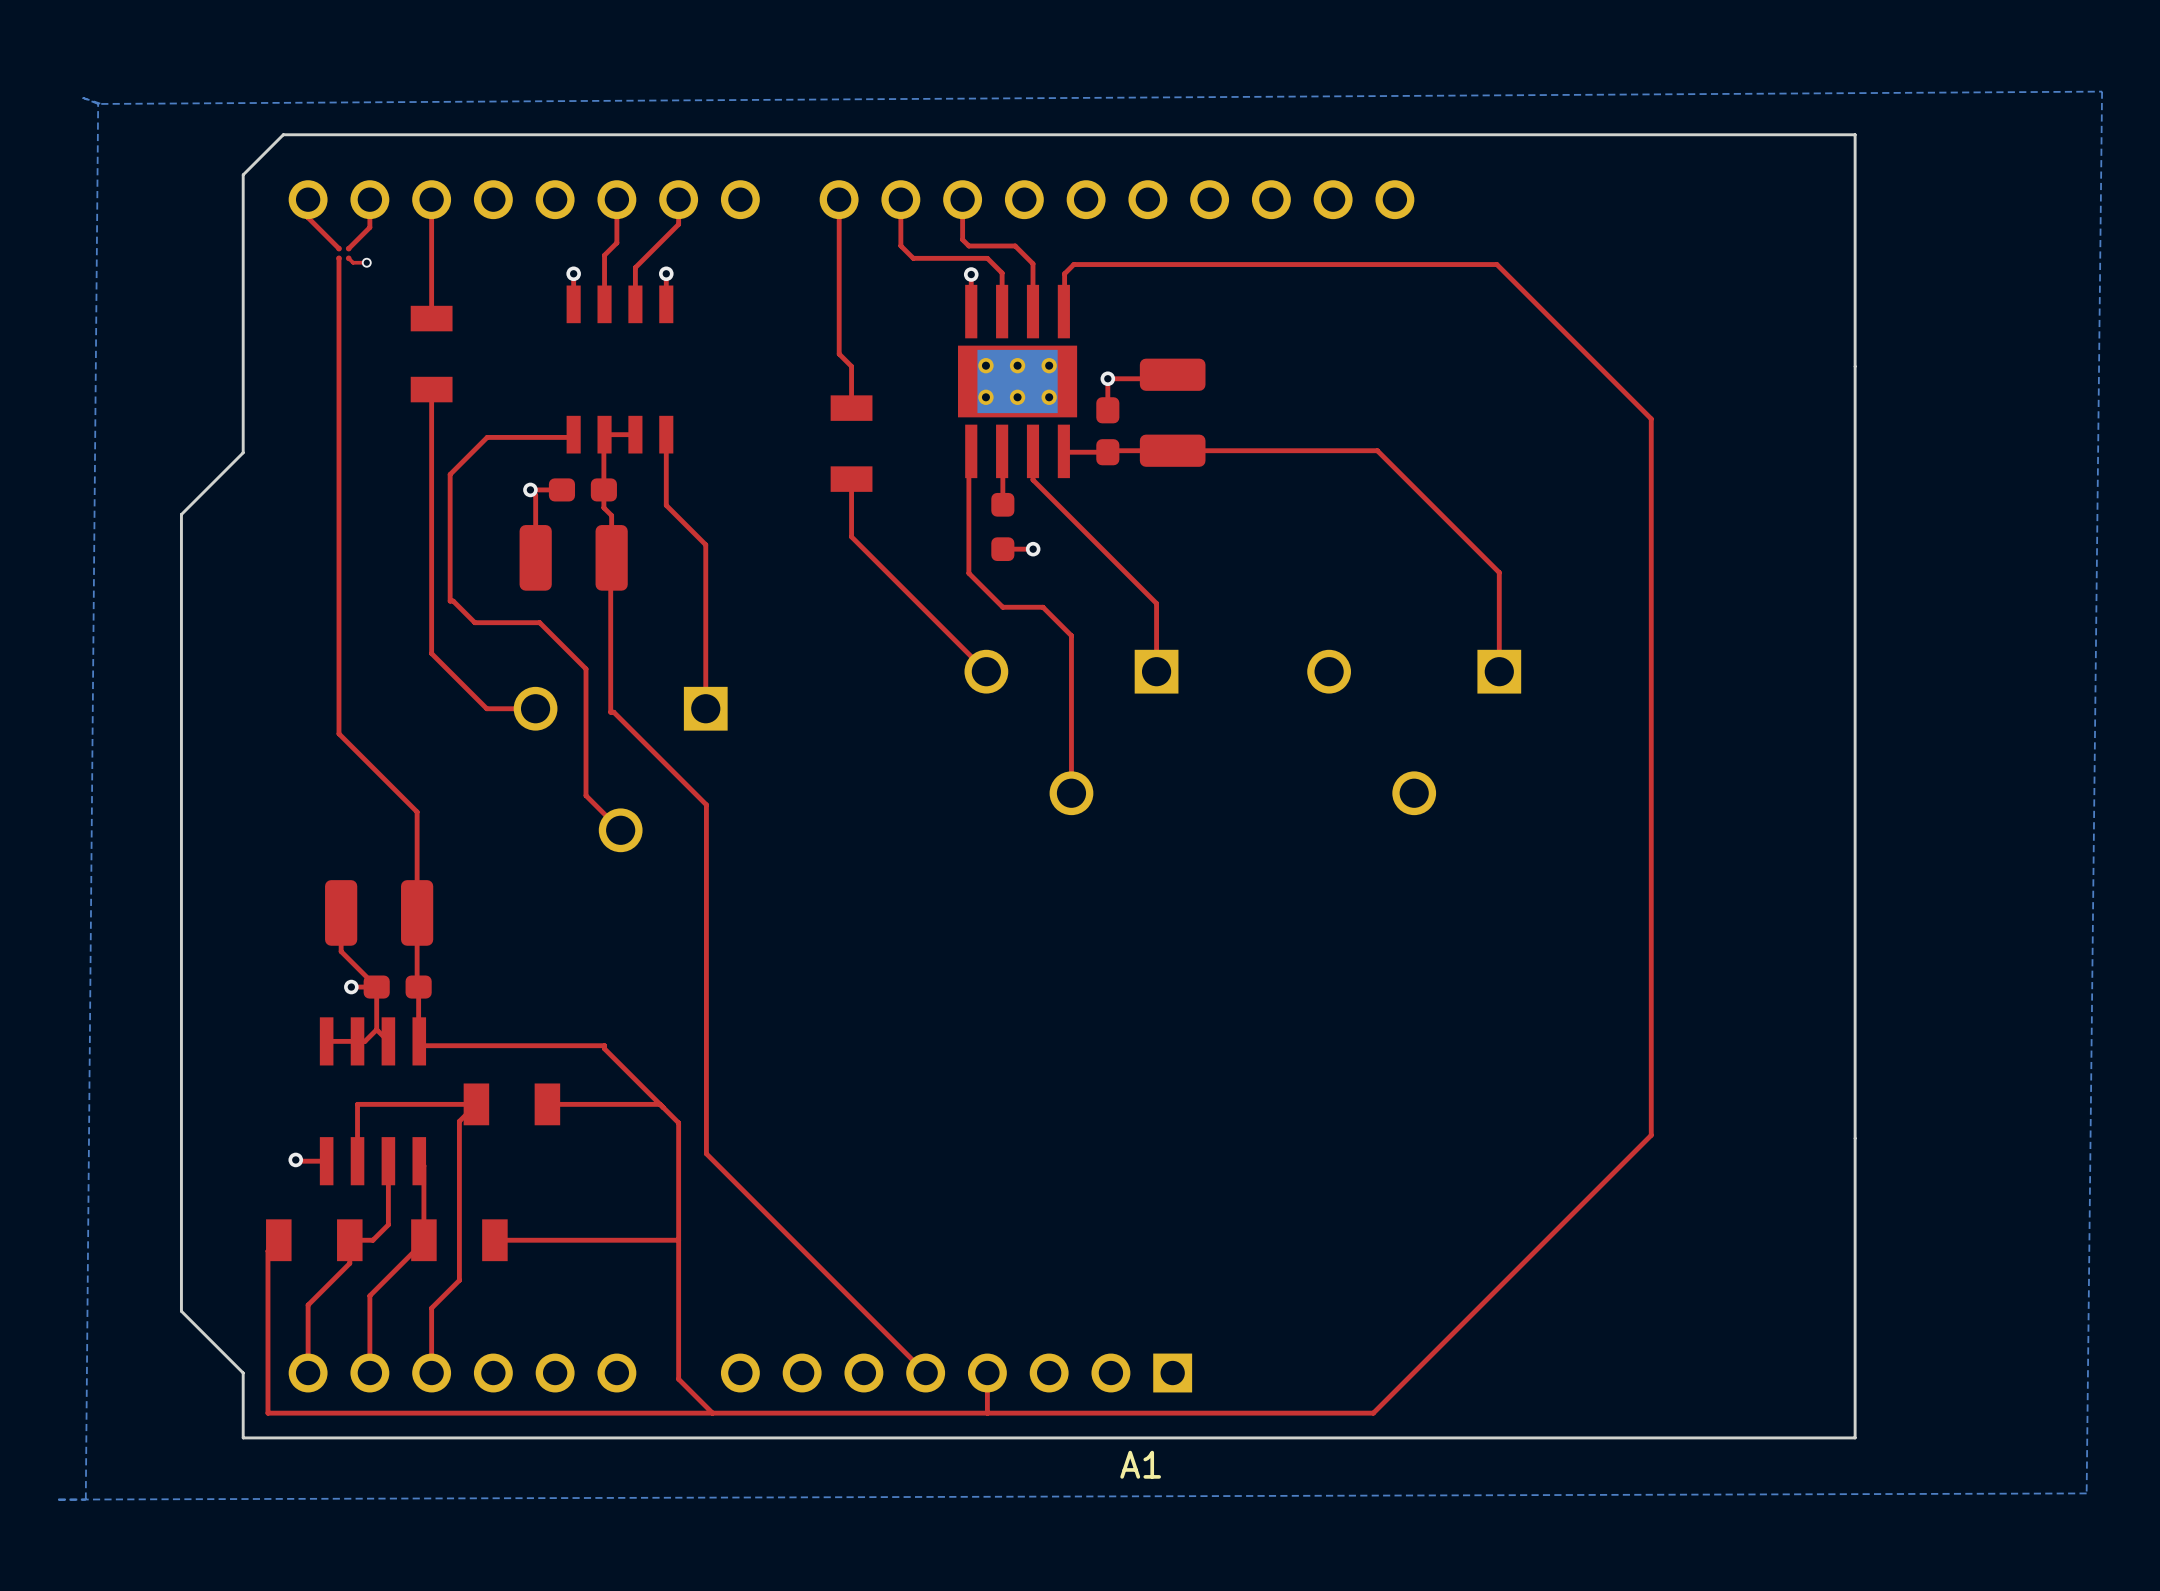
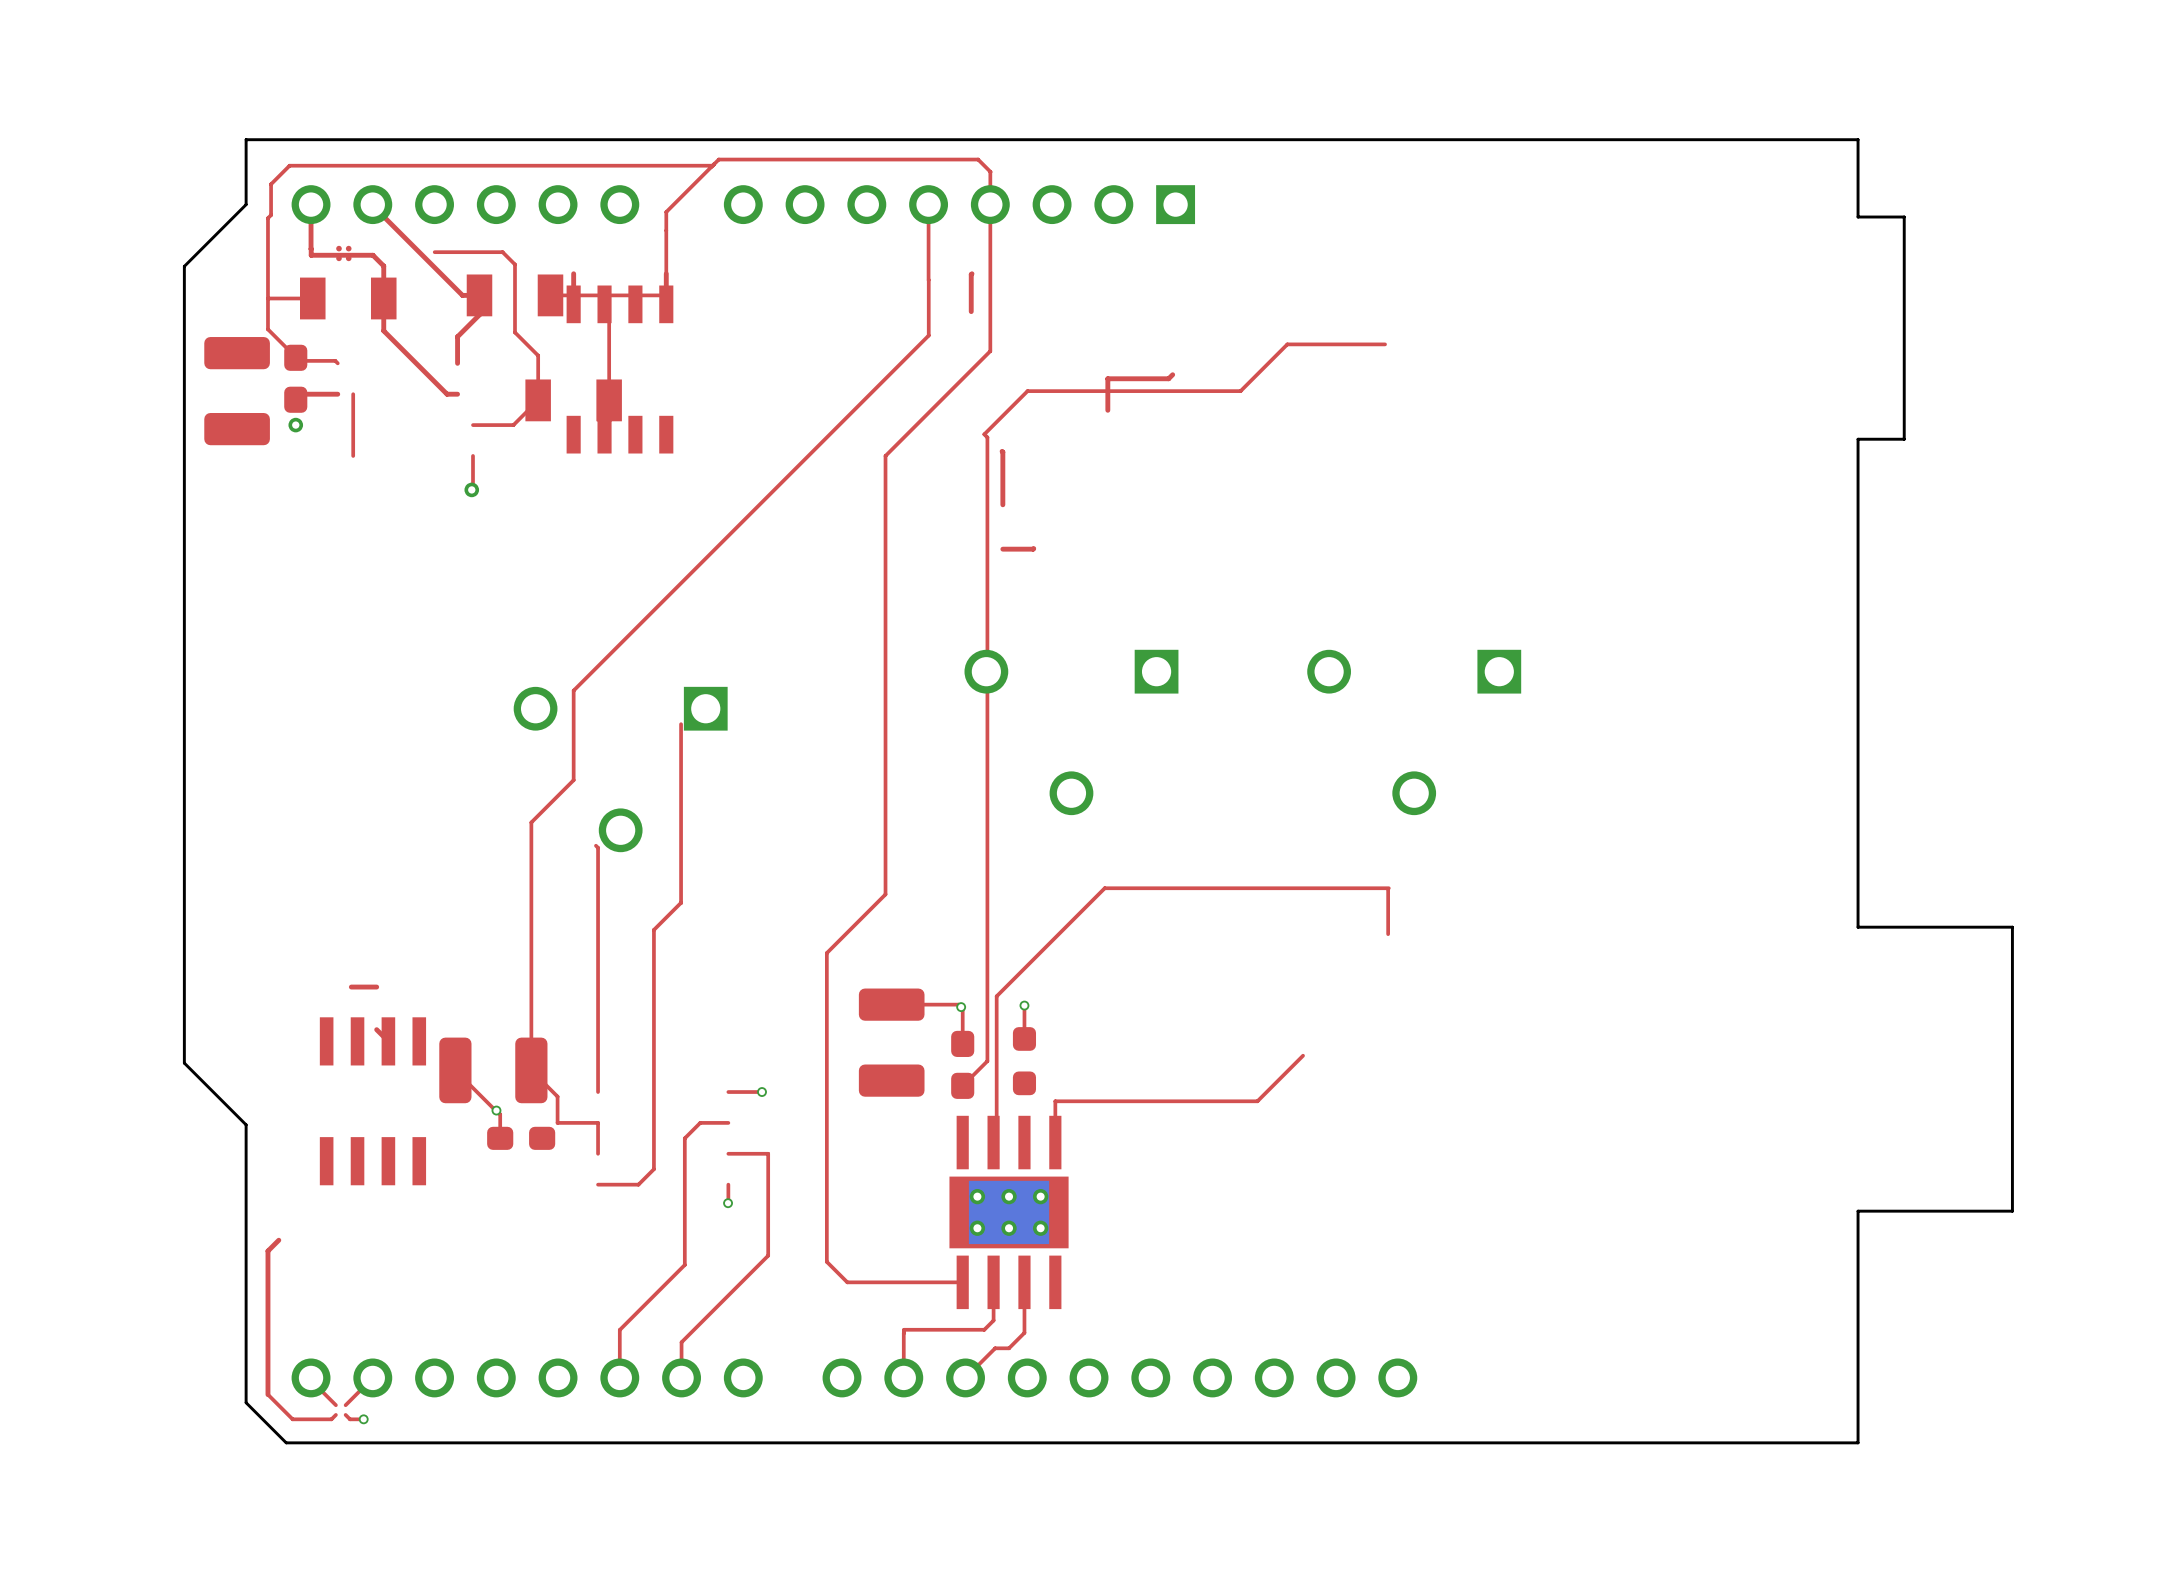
bottom zone outline: (2102, 91) (101, 103) (82, 97) (98, 103) (85, 1499) (58, 1499) (2086, 1493) (2102, 91) -> none
top track: none -> (712, 165) (289, 165) (271, 184) (271, 215) (267, 218) (267, 329) (299, 360) (335, 360) (337, 363)
top track: none -> (990, 171) (978, 159) (718, 159) (666, 212) (666, 273)
top track: none -> (990, 172) (990, 351) (885, 455) (885, 894) (826, 953) (826, 1261) (847, 1282) (962, 1282)
top track: (308, 199) (308, 217) (338, 248) -> none
top track: (431, 199) (431, 318) -> none
top track: (616, 199) (616, 242) (604, 255) (604, 304) -> none
top track: (678, 199) (678, 224) (635, 267) (635, 304) -> none
top track: (839, 199) (839, 354) (851, 366) (851, 408) -> none
top track: (900, 199) (900, 245) (913, 258) (987, 258) (1002, 273) (1002, 311) -> none
top track: (962, 199) (962, 239) (968, 245) (1015, 245) (1033, 263) (1033, 311) -> none
top track: (372, 202) (369, 199) (369, 227) (348, 248) -> none
top track: none -> (311, 204) (311, 248)
top track: none -> (928, 204) (928, 280)
top track: none -> (372, 205) (462, 295) (479, 295) (479, 314) (457, 336) (457, 363)
top track: none -> (311, 249) (311, 255) (372, 255) (383, 266) (383, 330) (447, 394) (457, 394)
top track: none -> (434, 252) (502, 252) (514, 264) (514, 332) (538, 355) (538, 400) (513, 425) (473, 425)
top track: (338, 258) (338, 733) (417, 811) (418, 1040) (423, 1045) (604, 1045) (604, 1048) (678, 1122) (678, 1379) (712, 1413) -> none
top track: (348, 258) (353, 262) (366, 262) -> none
via: (366, 262) -> none
via: (573, 273) -> none
via: (666, 273) -> none
via: (971, 274) -> none
top track: none -> (928, 279) (928, 335) (573, 690) (573, 780) (531, 822) (531, 1070) (557, 1096) (557, 1122) (598, 1122) (598, 1153)
part: none -> (514, 295)
top track: none -> (607, 295) (609, 296) (609, 400)
top track: none -> (666, 295) (550, 295)
top track: none -> (312, 298) (267, 298)
part: none -> (348, 298)
top track: (1063, 311) (1064, 273) (1073, 264) (1496, 264) (1651, 418) (1651, 1135) (1373, 1413) (267, 1413) (267, 1394) -> (335, 1414) (331, 1419) (292, 1419) (267, 1394)
top track: none -> (1385, 344) (1287, 344) (1240, 391) (1027, 391) (984, 434) (987, 437) (987, 1061) (962, 1085)
part: (431, 354) -> none
via: (1107, 378) -> none
part: (1017, 381) -> none
top track: (431, 389) (431, 653) (486, 708) (535, 708) -> none
part: none -> (237, 391)
top track: none -> (337, 394) (288, 394)
top track: none -> (353, 394) (353, 455)
part: none -> (573, 400)
part: (1172, 412) -> none
via: none -> (295, 425)
part: (1107, 431) -> none
top track: (573, 434) (570, 437) (487, 437) (450, 474) (450, 601) (453, 601) (474, 622) (539, 622) (586, 669) (586, 795) (620, 830) -> none
top track: (635, 434) (603, 435) (603, 507) (611, 515) (610, 712) (613, 712) (706, 804) (706, 1153) (925, 1373) -> none
top track: (666, 434) (666, 505) (705, 544) (705, 708) -> none
part: (851, 443) -> none
top track: (971, 451) (968, 453) (968, 573) (1002, 607) (1042, 607) (1071, 635) (1071, 793) -> none
top track: (1033, 451) (1033, 479) (1156, 603) (1156, 671) -> none
top track: (1063, 451) (1377, 450) (1499, 572) (1499, 671) -> none
top track: none -> (473, 455) (471, 489)
top track: (851, 479) (851, 536) (986, 671) -> none
via position: (530, 489) -> (471, 489)
top track: (561, 489) (530, 489) (535, 495) (535, 557) -> none
part rotation: 0° (582, 489) -> 90° clockwise (295, 378)
part position: (582, 489) -> (295, 378)
part position: (1002, 526) -> (1024, 1061)
via: (1033, 549) -> none
part: (573, 557) -> none
top track: none -> (681, 724) (681, 903)
A1 side: bottom (1018, 786) -> top (1098, 791)
top track: none -> (595, 845) (598, 847) (598, 1092)
top track: none -> (1388, 888) (1104, 888) (996, 996) (996, 1139) (993, 1142)
top track: none -> (1388, 888) (1388, 934)
top track: none -> (680, 902) (653, 929) (653, 1169) (638, 1184) (598, 1184)
top track: (341, 912) (341, 951) (376, 987) (376, 1029) (364, 1041) (326, 1041) -> none
part position: (379, 912) -> (493, 1070)
via: (351, 987) -> none
part position: (397, 987) -> (521, 1138)
top track: none -> (891, 1004) (958, 1004) (962, 1008) (962, 1043) (967, 1038)
top track: none -> (1024, 1005) (1024, 1038)
via: none -> (1024, 1005)
via: none -> (961, 1007)
part: none -> (891, 1042)
top track: none -> (1303, 1055) (1257, 1101) (1055, 1101) (1055, 1142)
part: none -> (962, 1064)
top track: none -> (455, 1070) (500, 1114) (500, 1138)
top track: none -> (762, 1092) (728, 1092)
via: none -> (762, 1092)
part: (511, 1104) -> none
top track: (660, 1104) (547, 1104) -> none
via: none -> (496, 1110)
top track: none -> (728, 1122) (700, 1122) (684, 1138) (684, 1264) (619, 1329) (619, 1377)
top track: none -> (728, 1153) (768, 1153) (768, 1255) (681, 1342) (681, 1377)
top track: (295, 1159) (326, 1161) -> none
via: (295, 1159) -> none
top track: (357, 1161) (357, 1104) (476, 1104) (459, 1121) (459, 1280) (431, 1308) (431, 1373) -> none
top track: (388, 1161) (388, 1224) (372, 1240) (349, 1240) (349, 1263) (308, 1305) (308, 1373) -> none
top track: (419, 1161) (423, 1165) (423, 1241) (369, 1295) (369, 1373) -> none
top track: none -> (728, 1184) (728, 1202)
via: none -> (728, 1203)
part: none -> (1009, 1212)
part: (314, 1240) -> none
part: (459, 1240) -> none
top track: (678, 1240) (494, 1240) -> none
top track: none -> (993, 1282) (993, 1320) (984, 1329) (904, 1329) (904, 1332)
top track: none -> (1024, 1282) (1024, 1332) (1009, 1348) (995, 1348) (965, 1377)
top track: none -> (903, 1333) (903, 1377)
top track: (987, 1373) (987, 1413) -> none
top track: none -> (372, 1378) (345, 1405)
top track: none -> (311, 1380) (335, 1405)
top track: none -> (345, 1414) (350, 1419) (363, 1419)
via: none -> (363, 1419)

